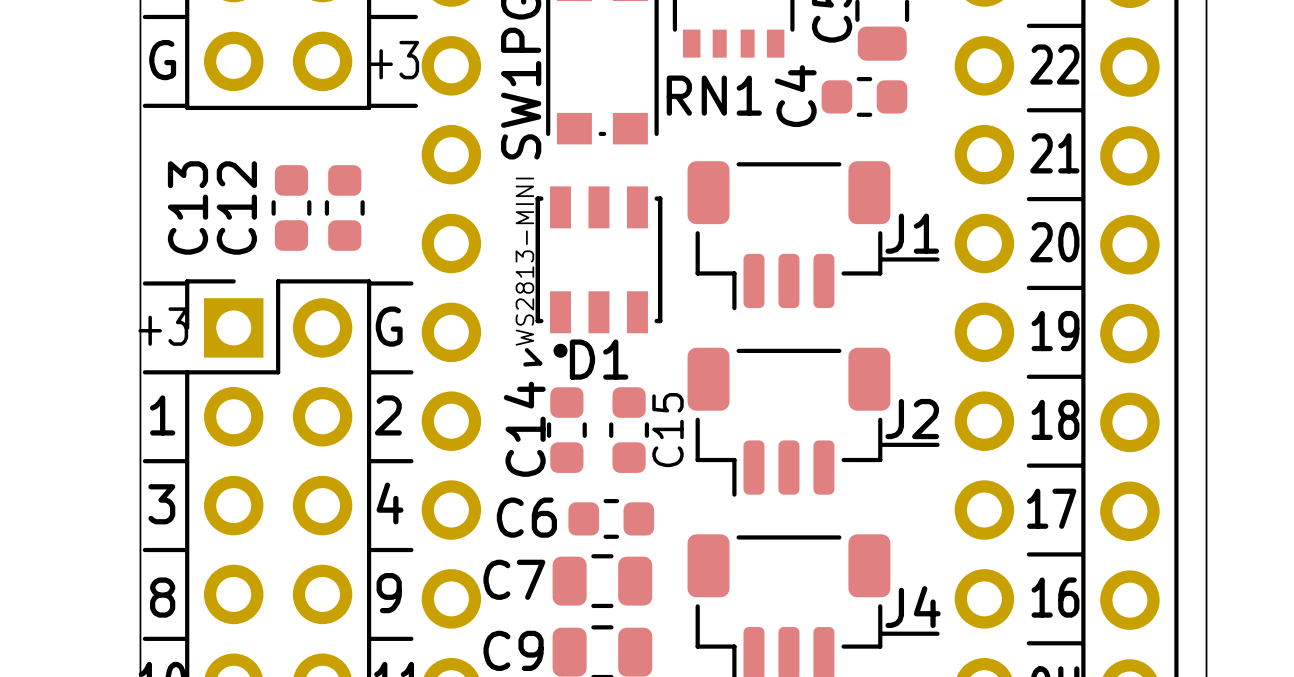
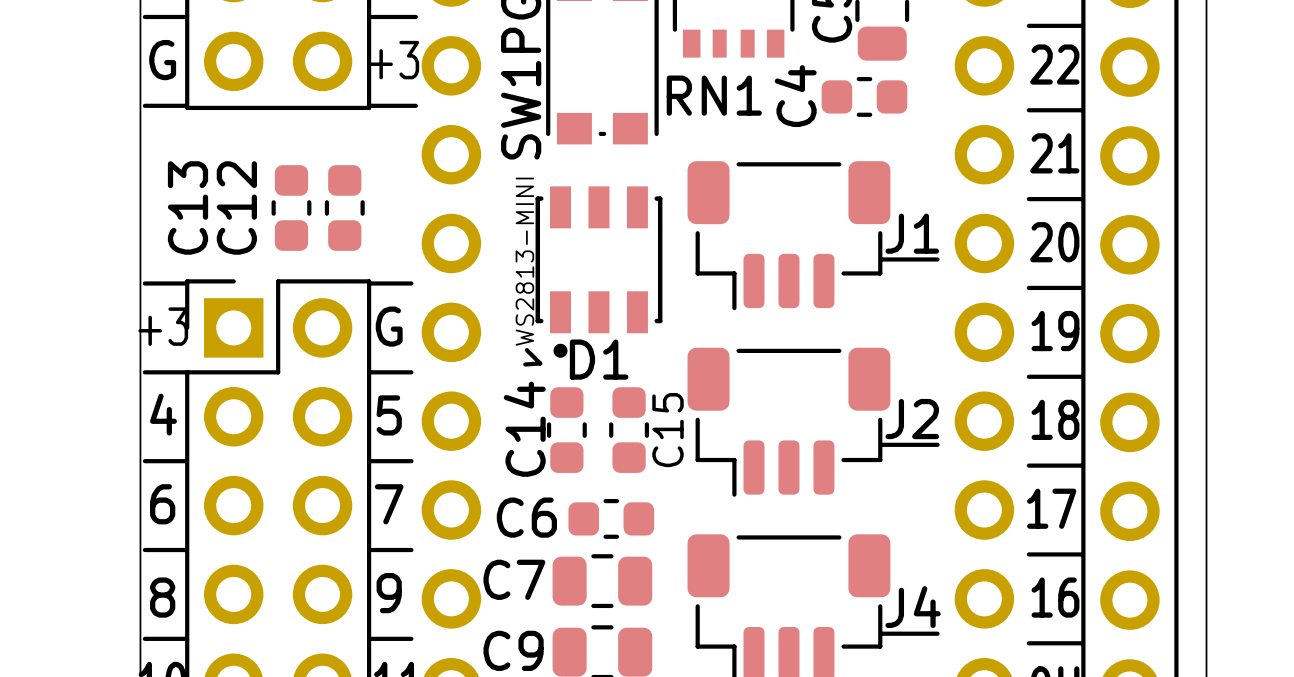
text: 1 (162, 415) -> 4 (163, 414)
text: 2 (388, 415) -> 5 (389, 415)
text: 4 (390, 503) -> 7 (389, 504)
text: 3 (161, 504) -> 6 (162, 504)

